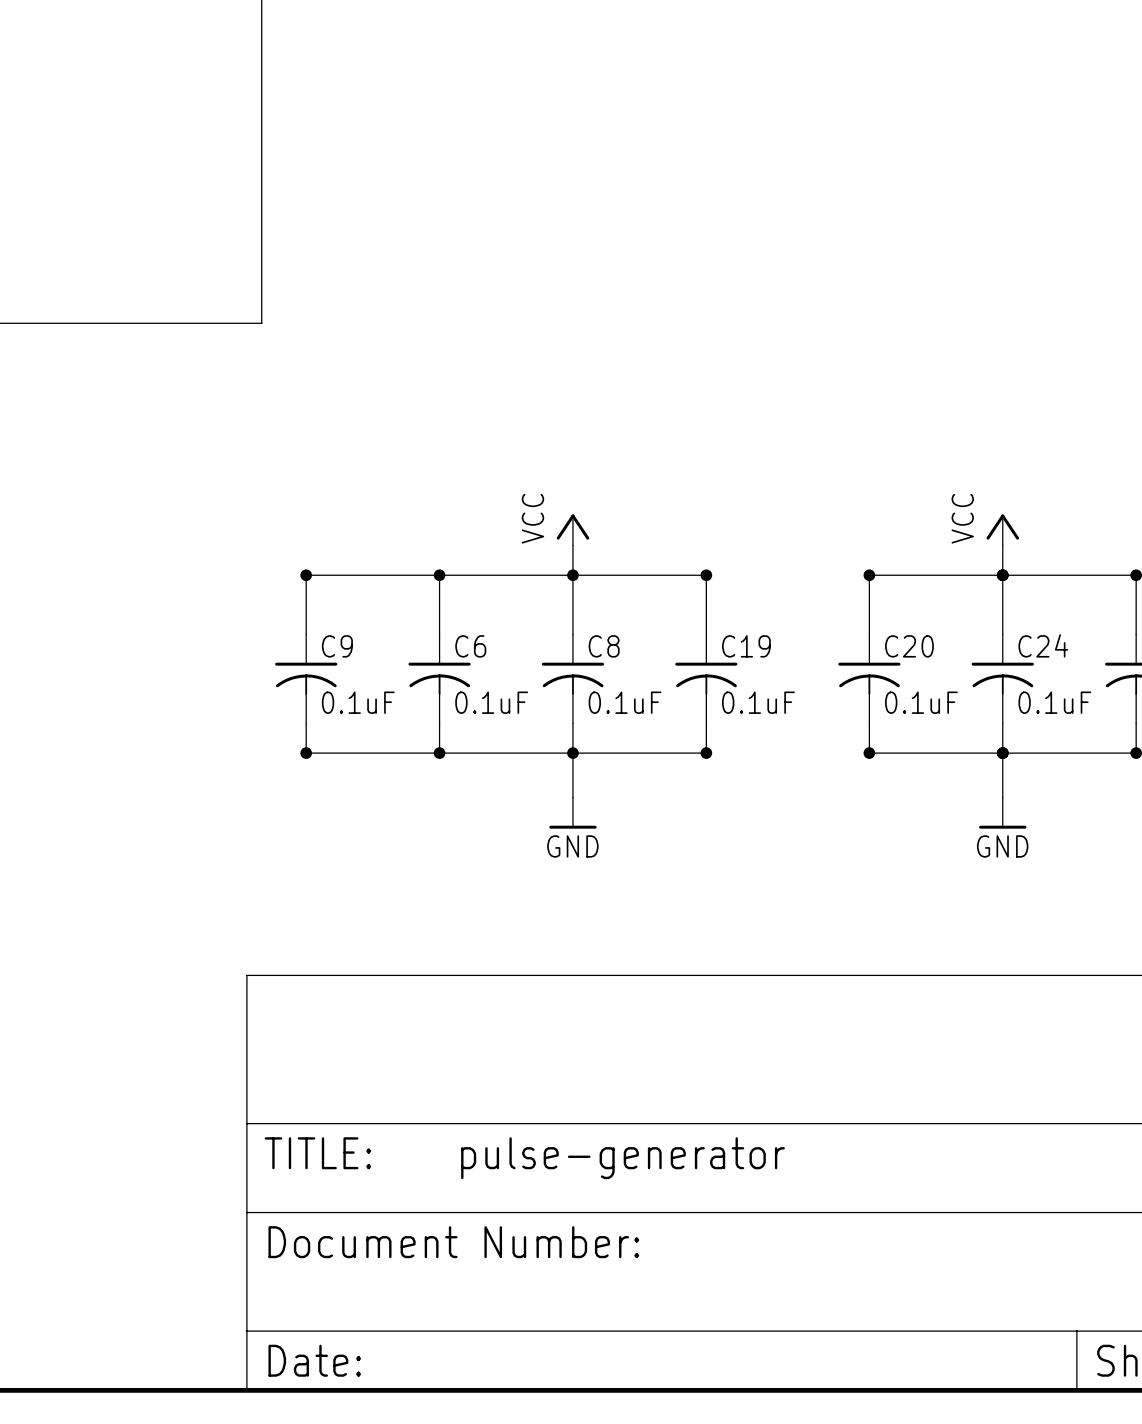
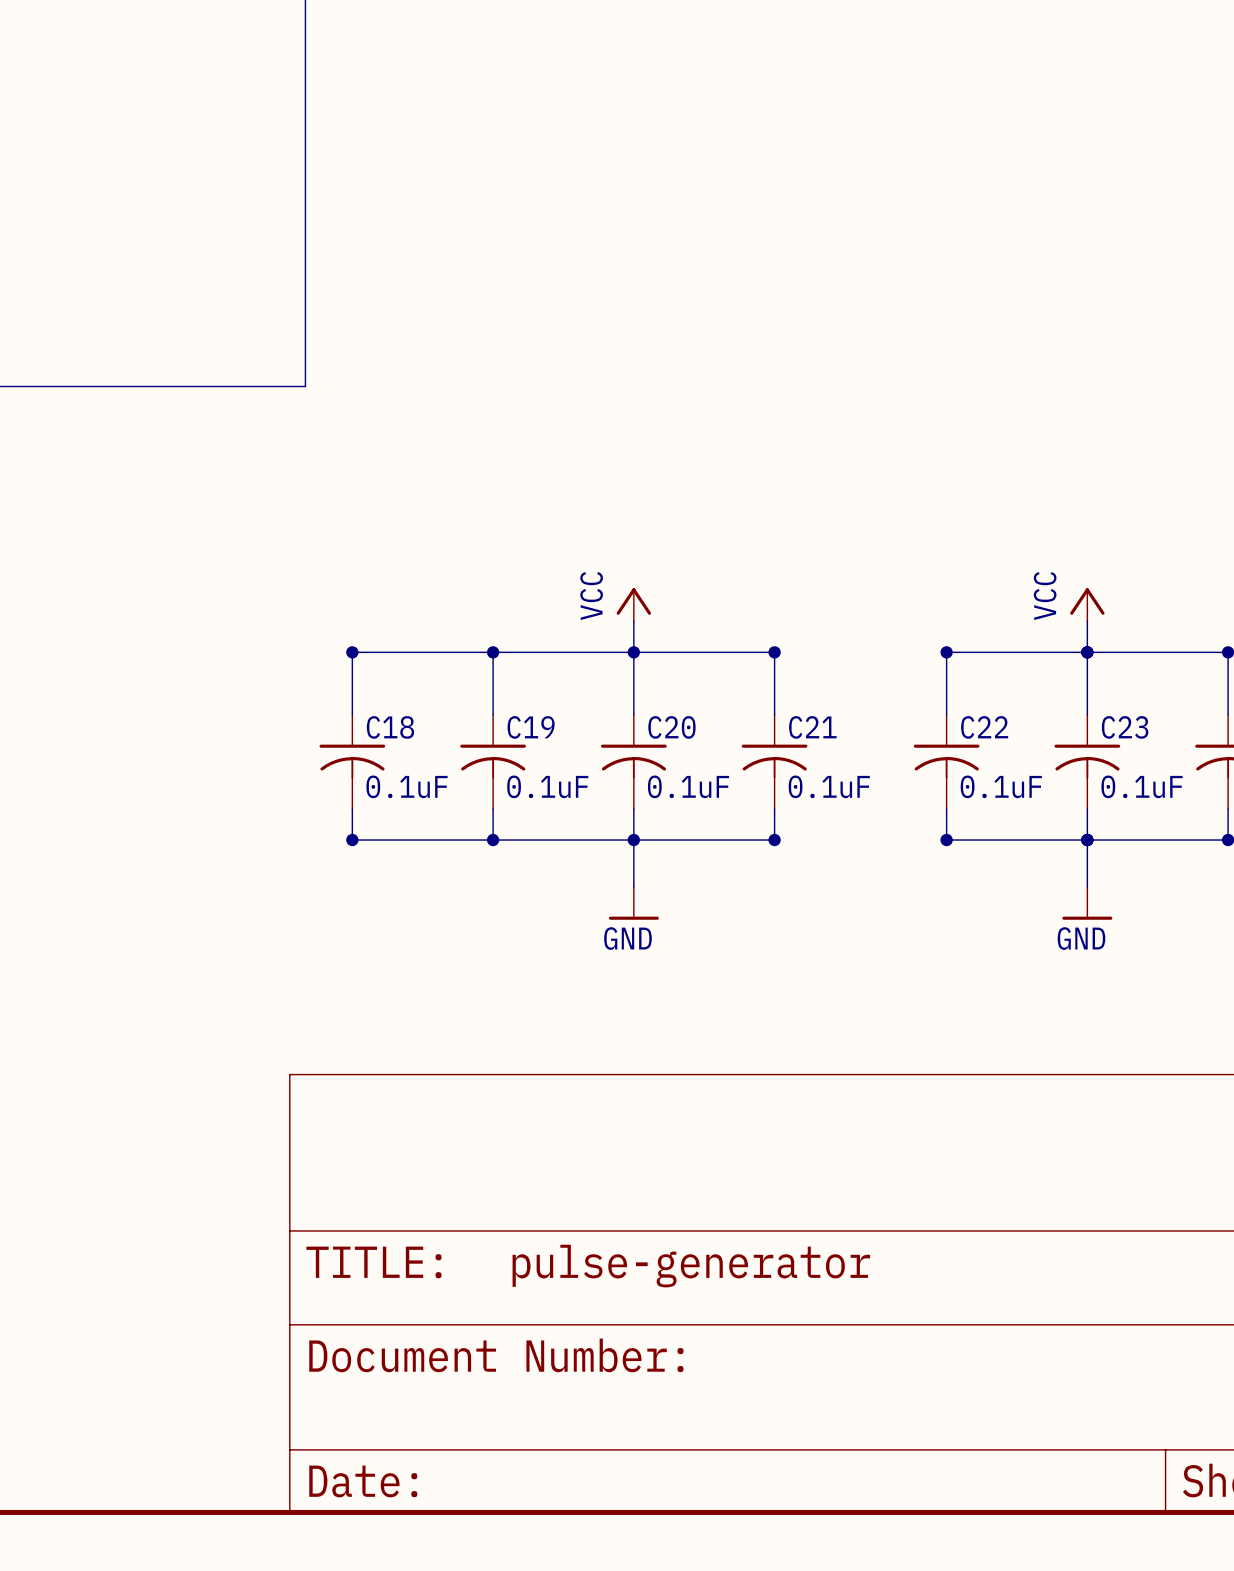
C24 name: C24 (1043, 645) -> C23 (1125, 727)
C9 name: C9 (337, 646) -> C18 (390, 727)
C6 name: C6 (470, 646) -> C19 (531, 727)
C8 name: C8 (604, 646) -> C20 (671, 727)
C19 name: C19 (746, 646) -> C21 (812, 727)
C20 name: C20 (909, 646) -> C22 (984, 727)

